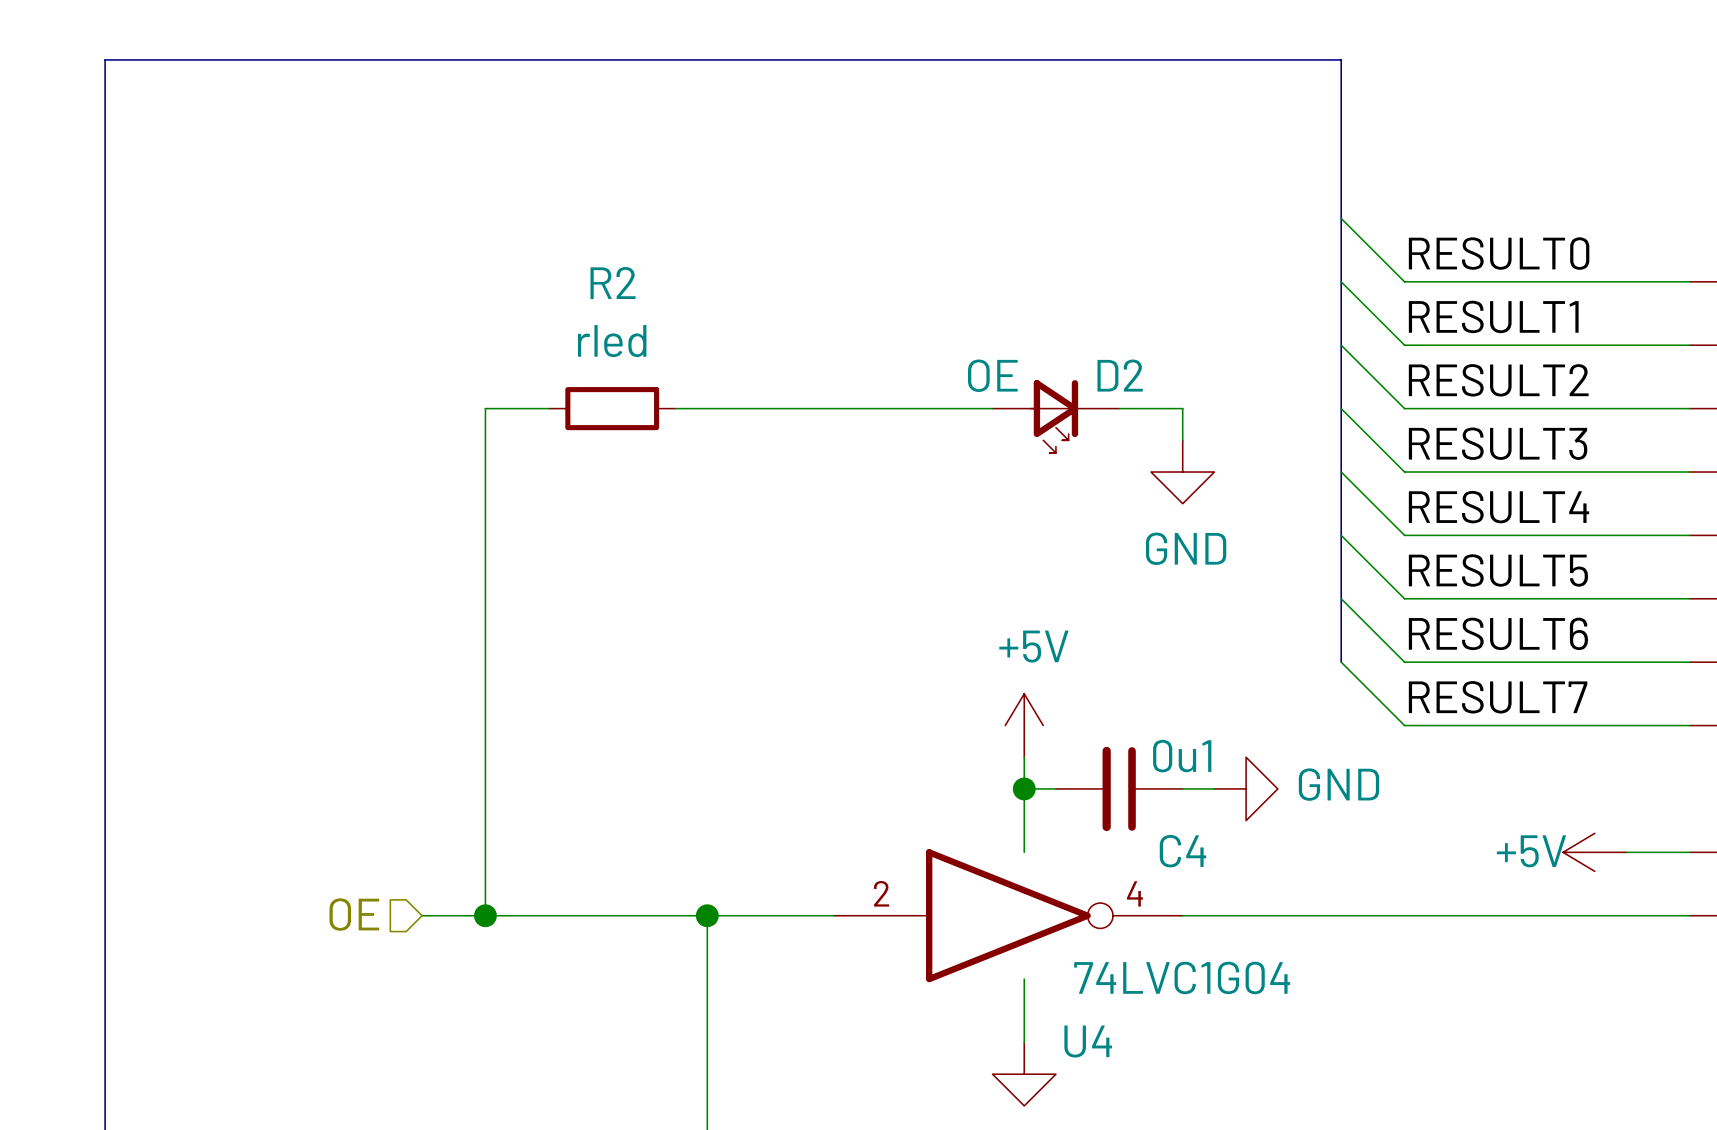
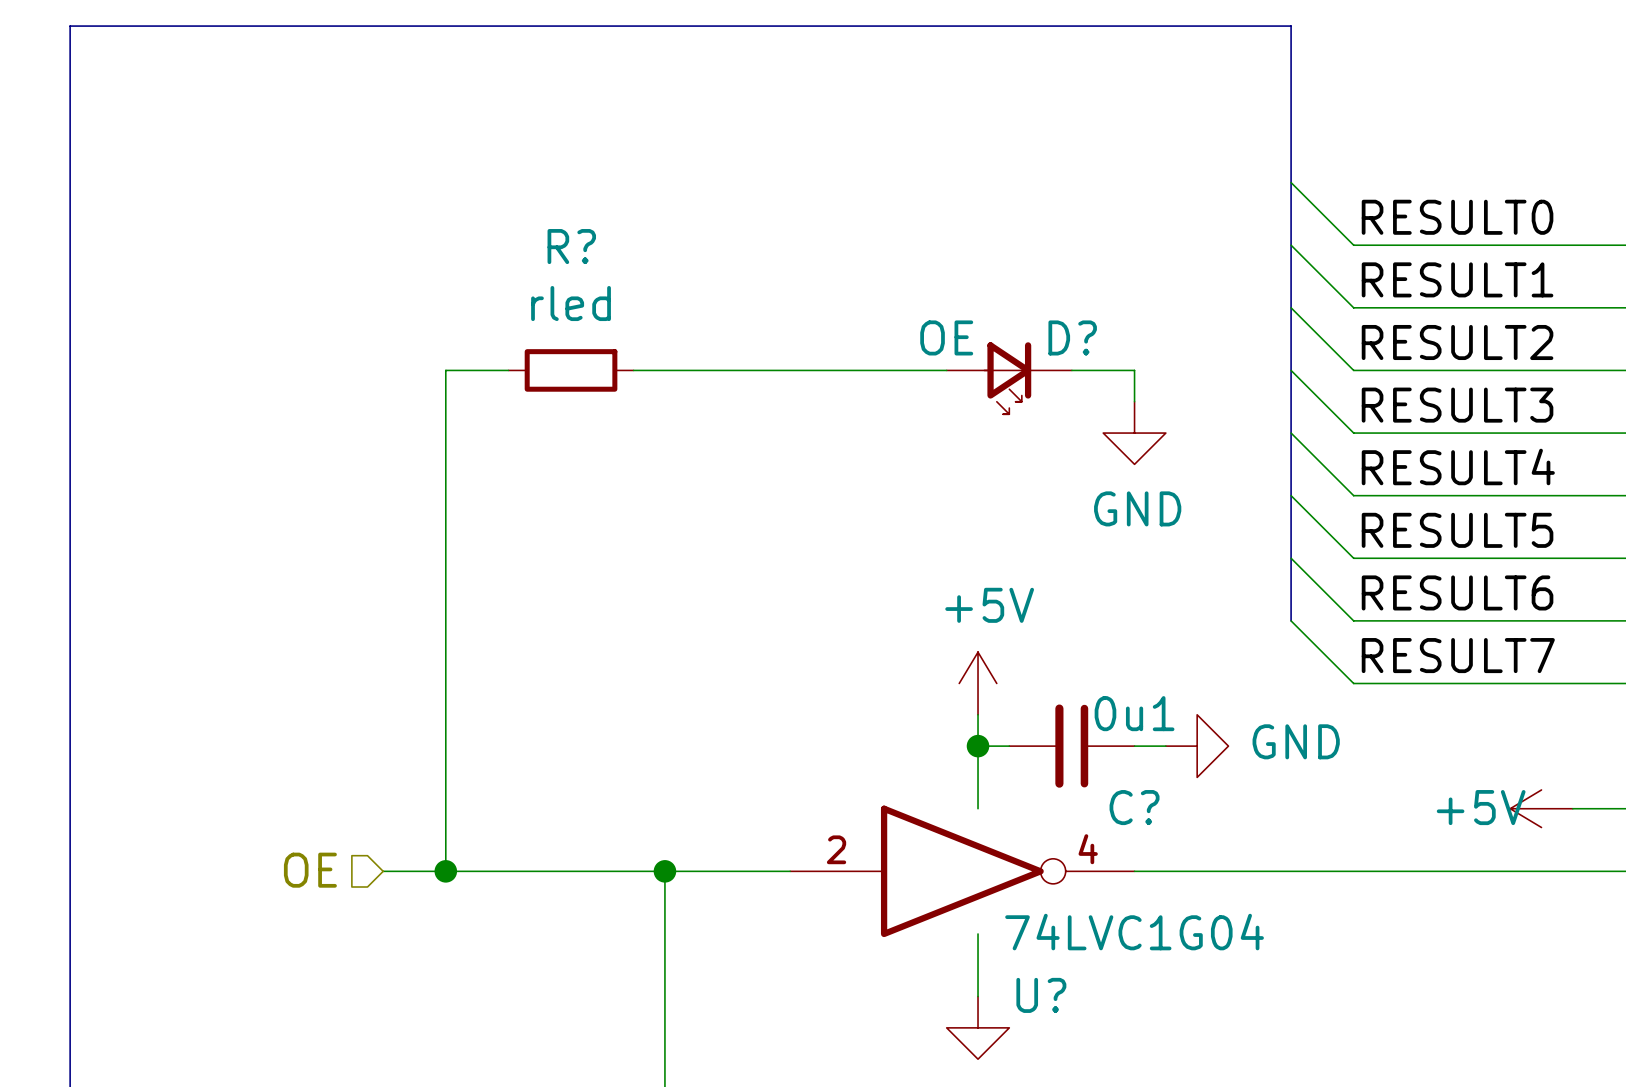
R2 name: R2 (613, 283) -> R? (571, 246)
D2 name: D2 (1120, 375) -> D? (1072, 337)
C4 name: C4 (1182, 851) -> C? (1134, 807)
U4 name: U4 (1088, 1041) -> U? (1041, 995)

